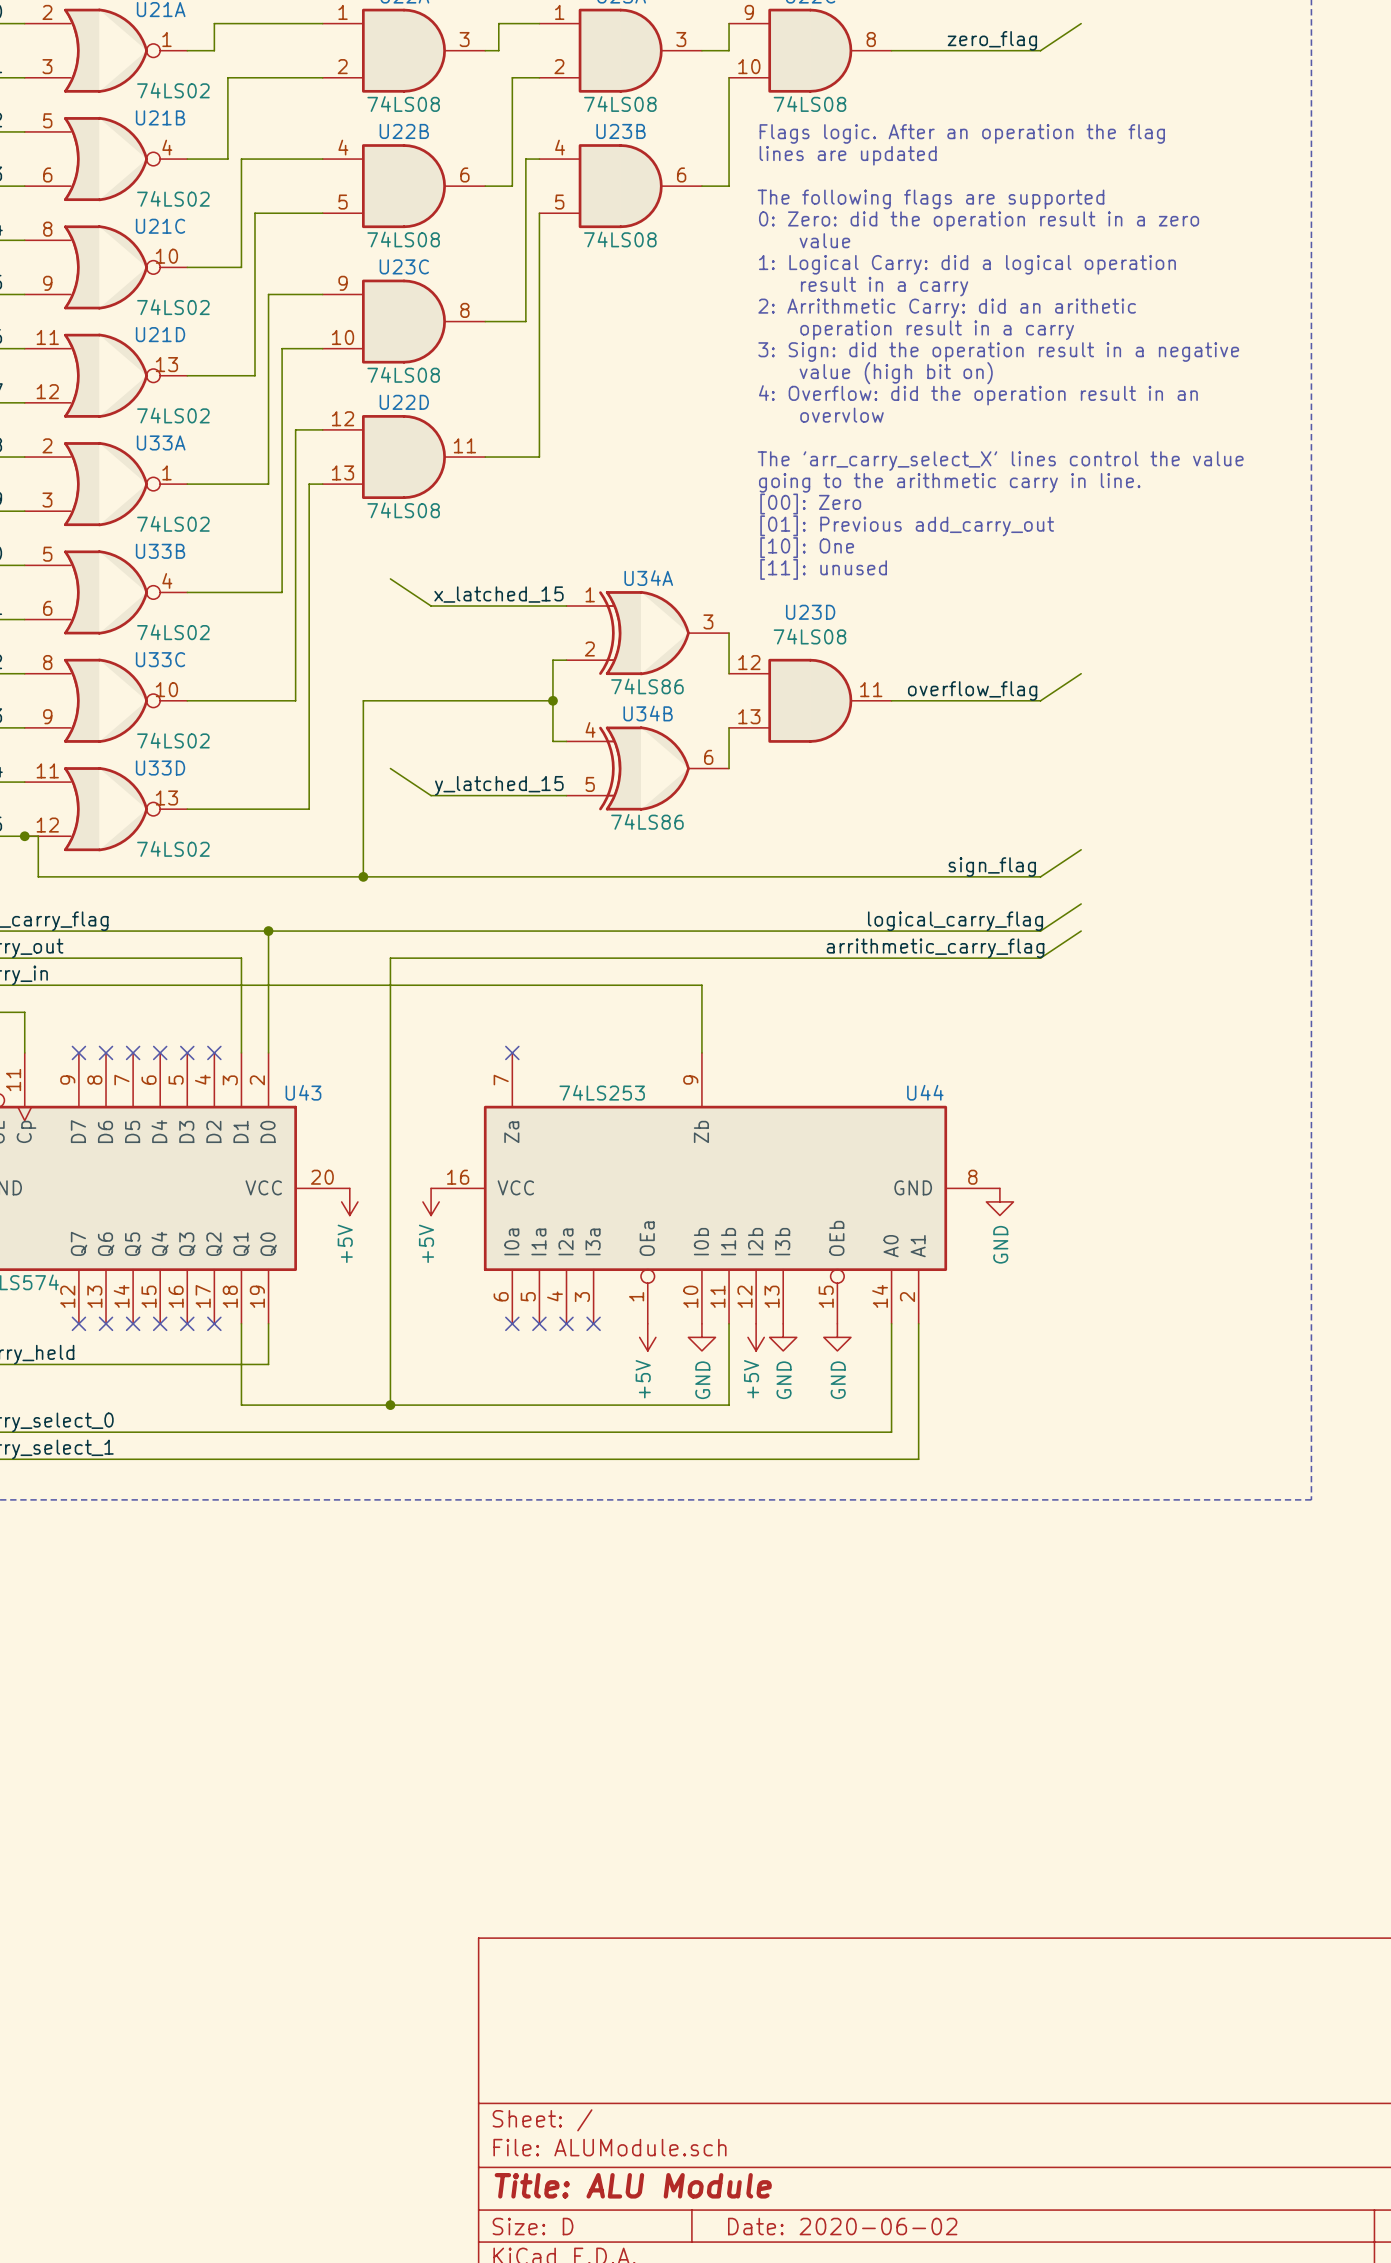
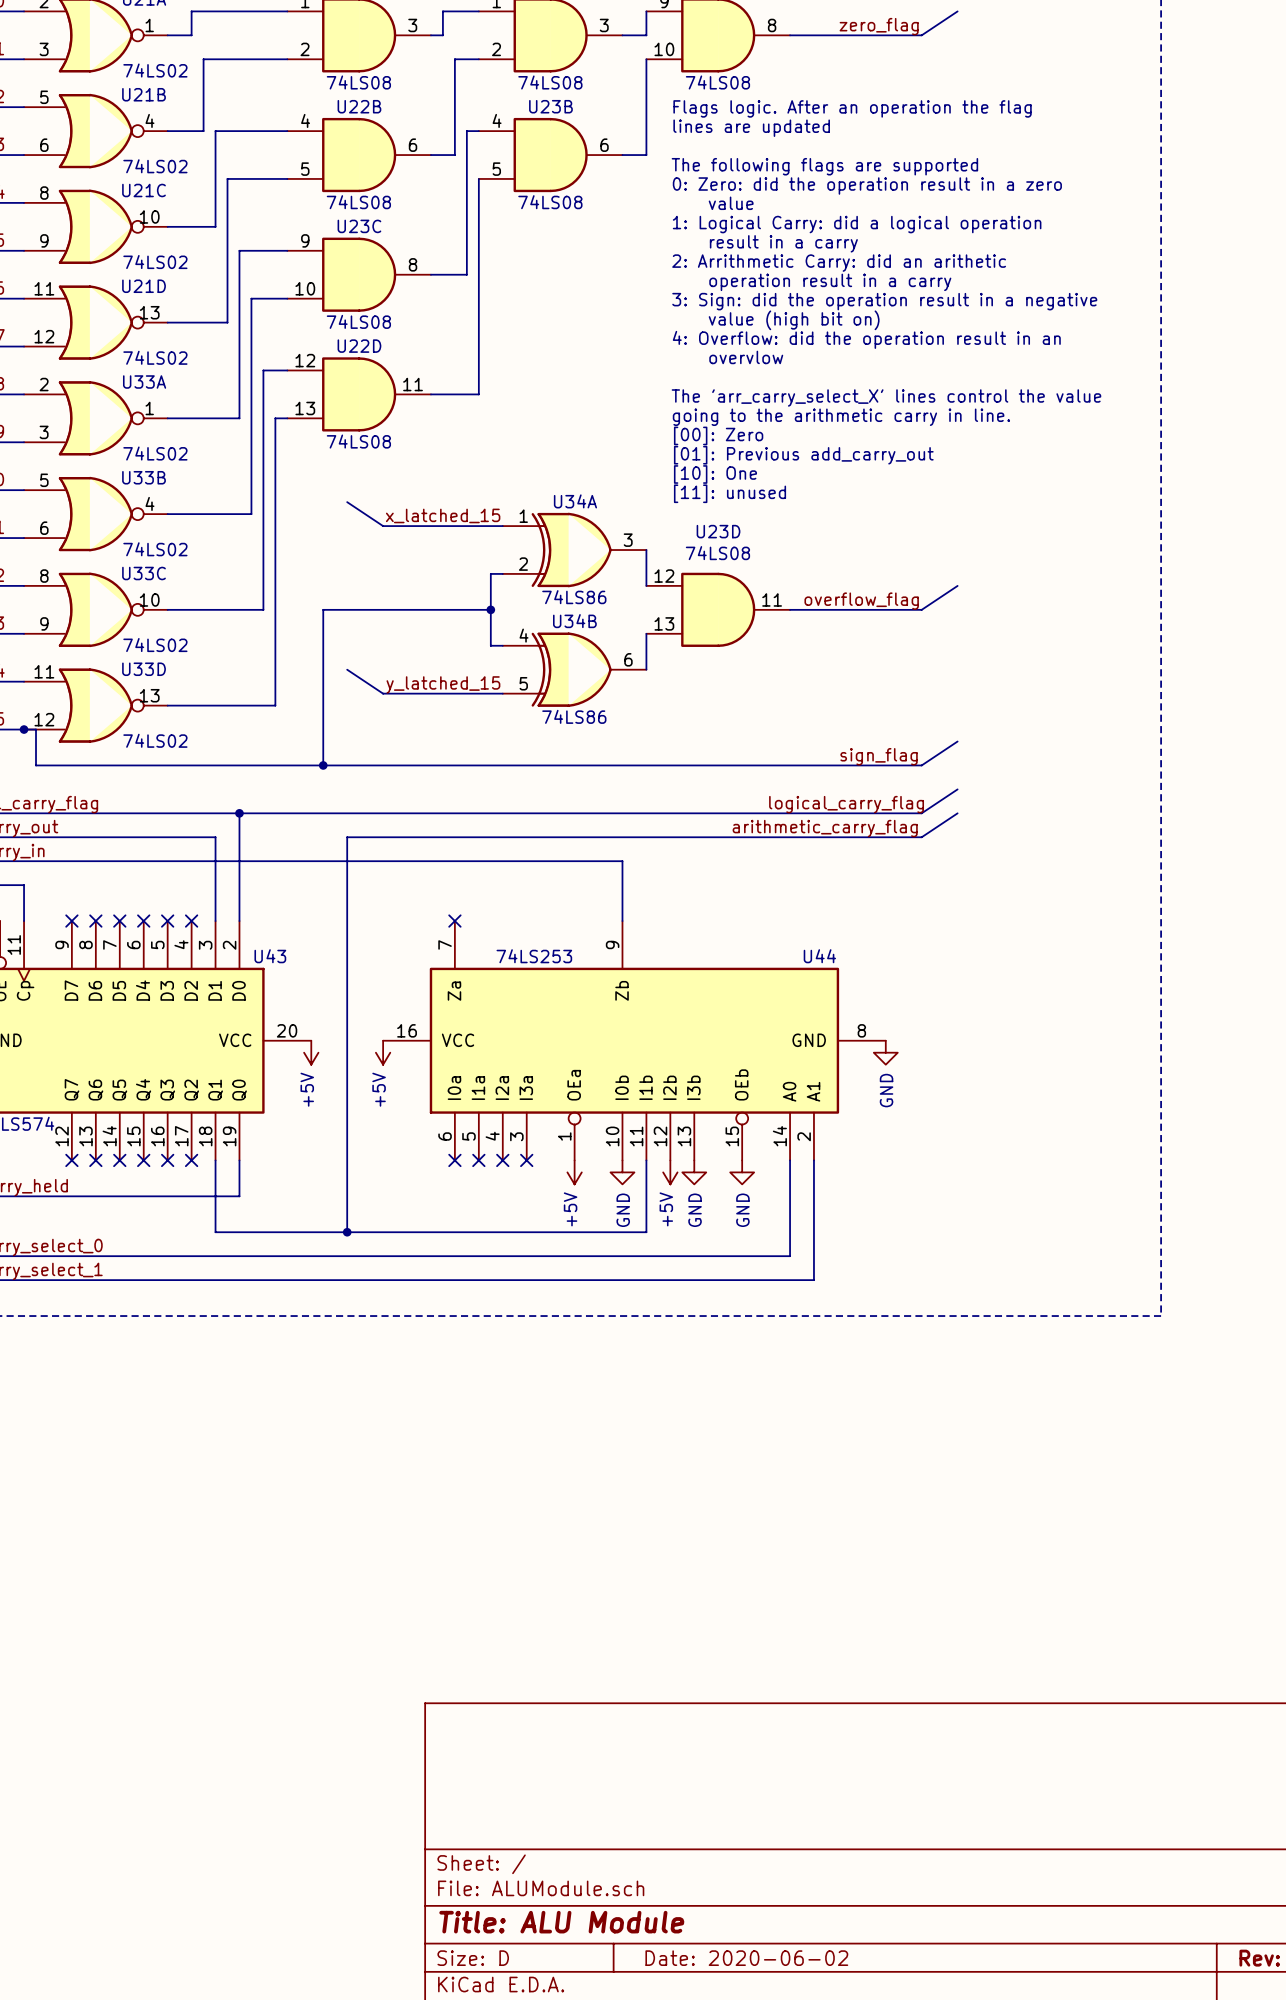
label: arrithmetic_carry_flag (935, 948) -> arithmetic_carry_flag (825, 828)

